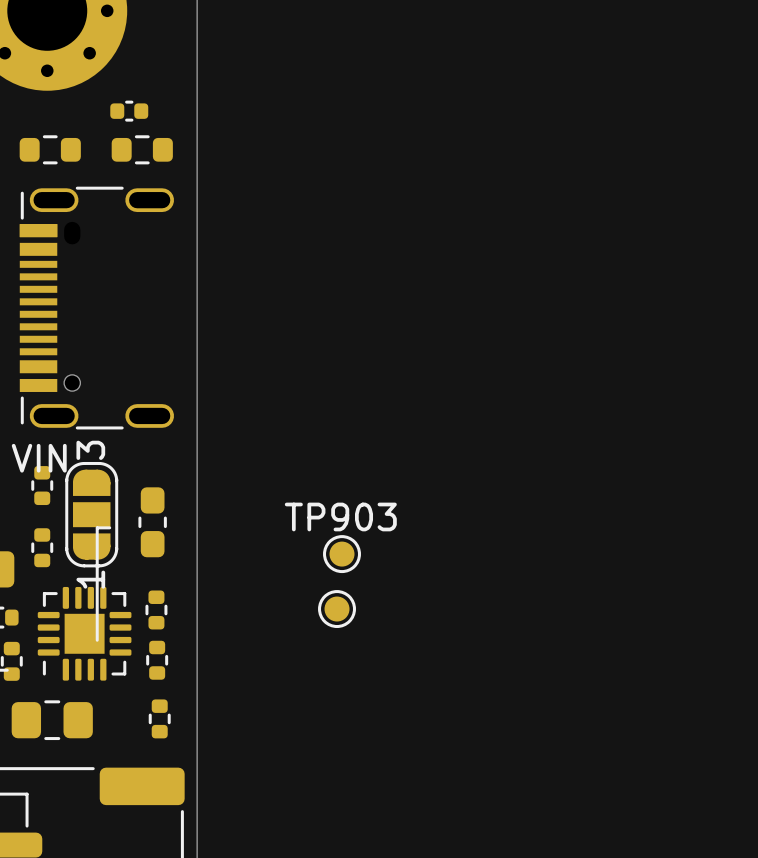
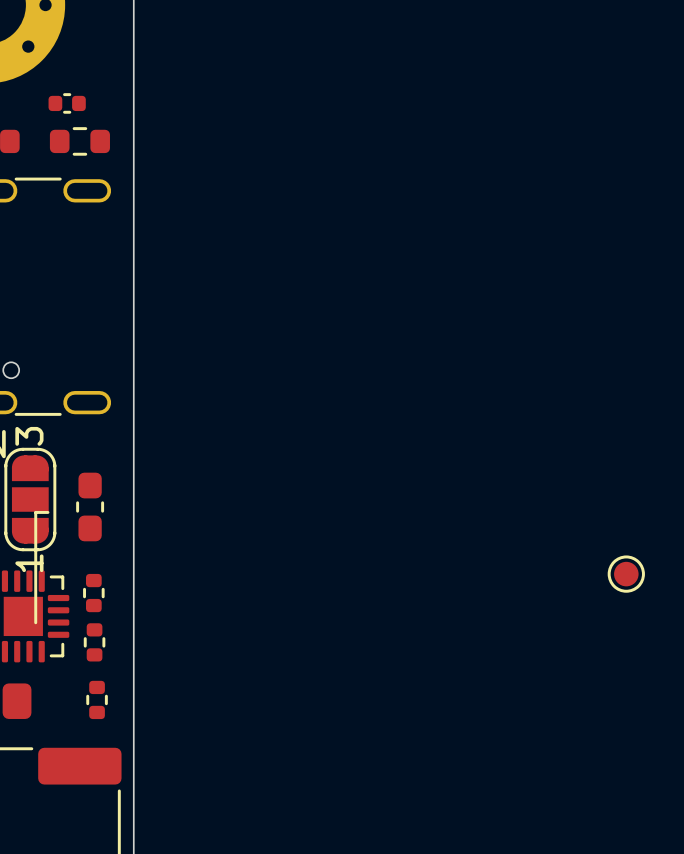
TP903: (342, 554) -> none
part position: (337, 609) -> (626, 574)

